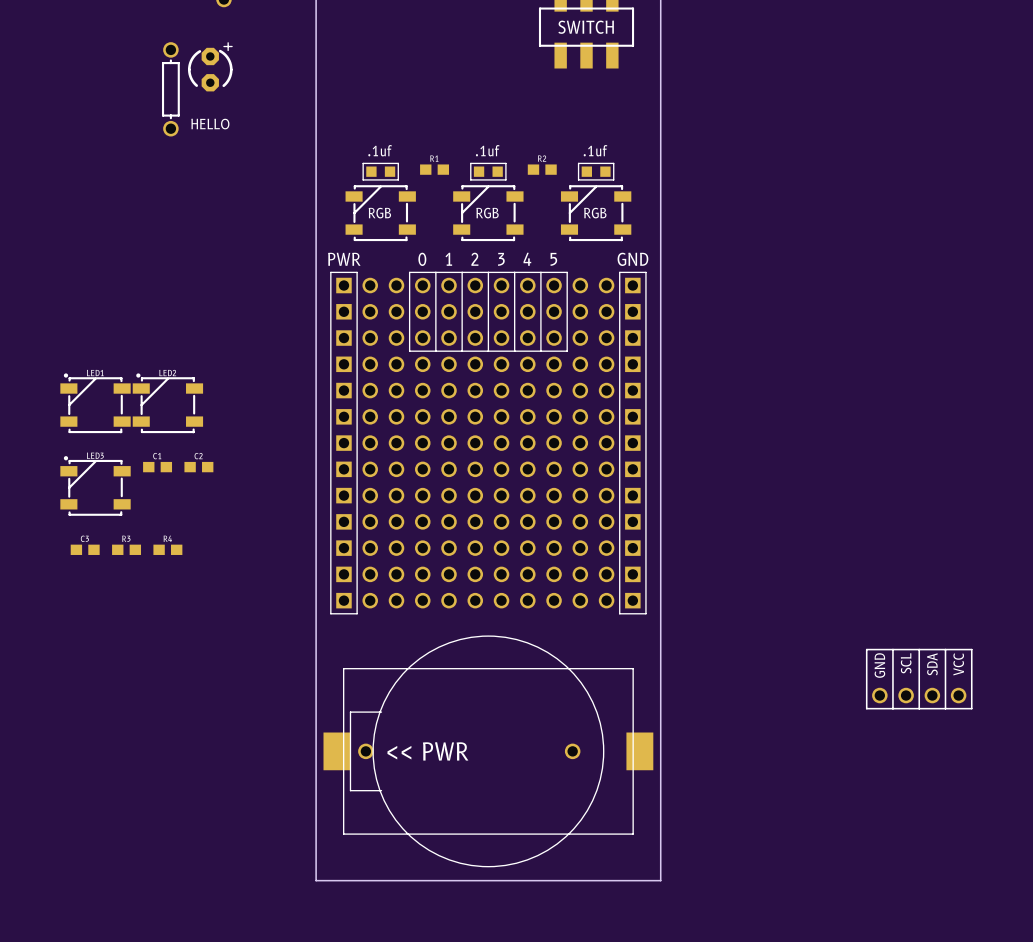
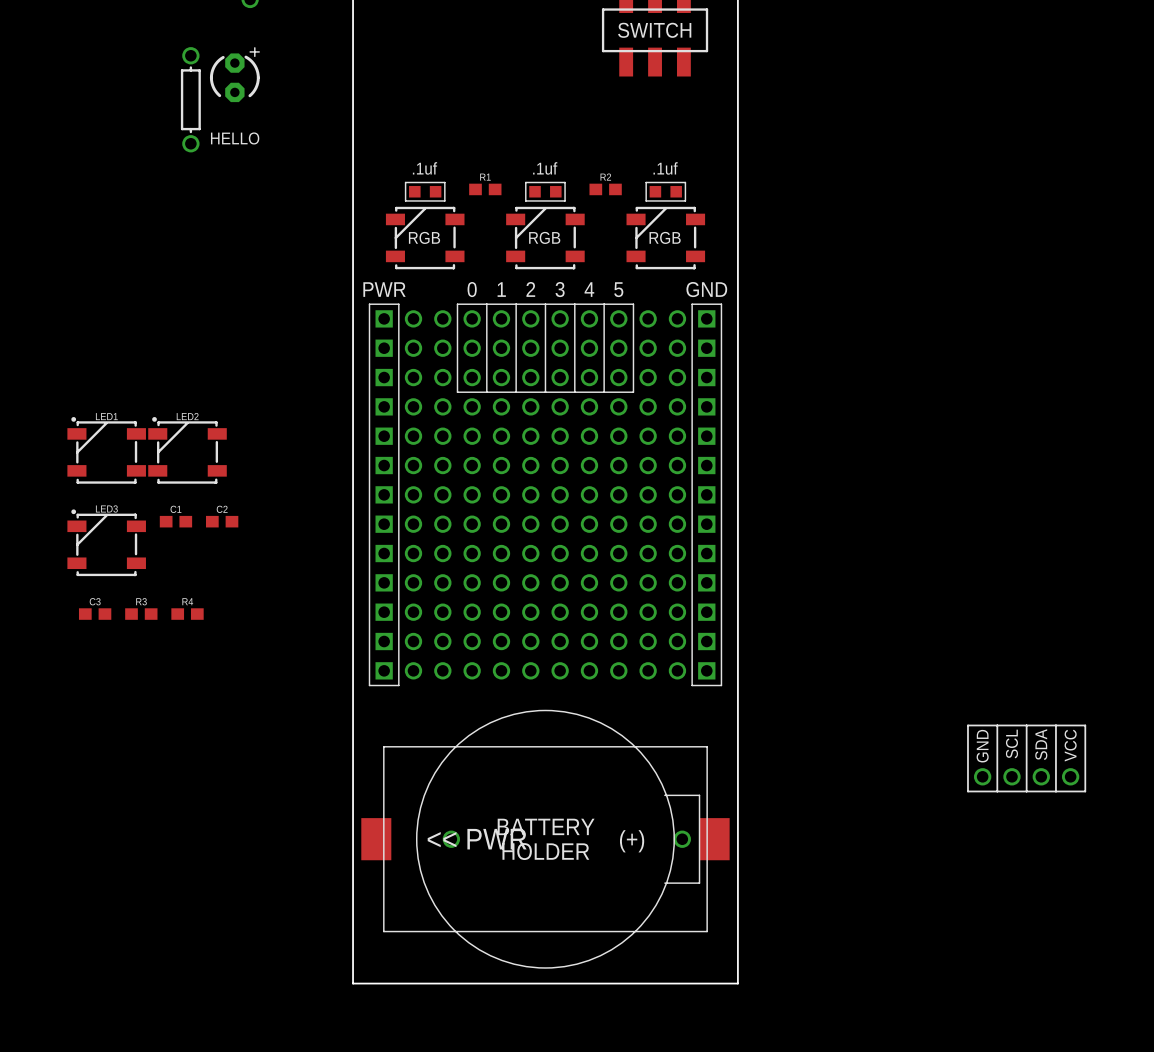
part: (477, 751) -> none
part: none -> (558, 839)

